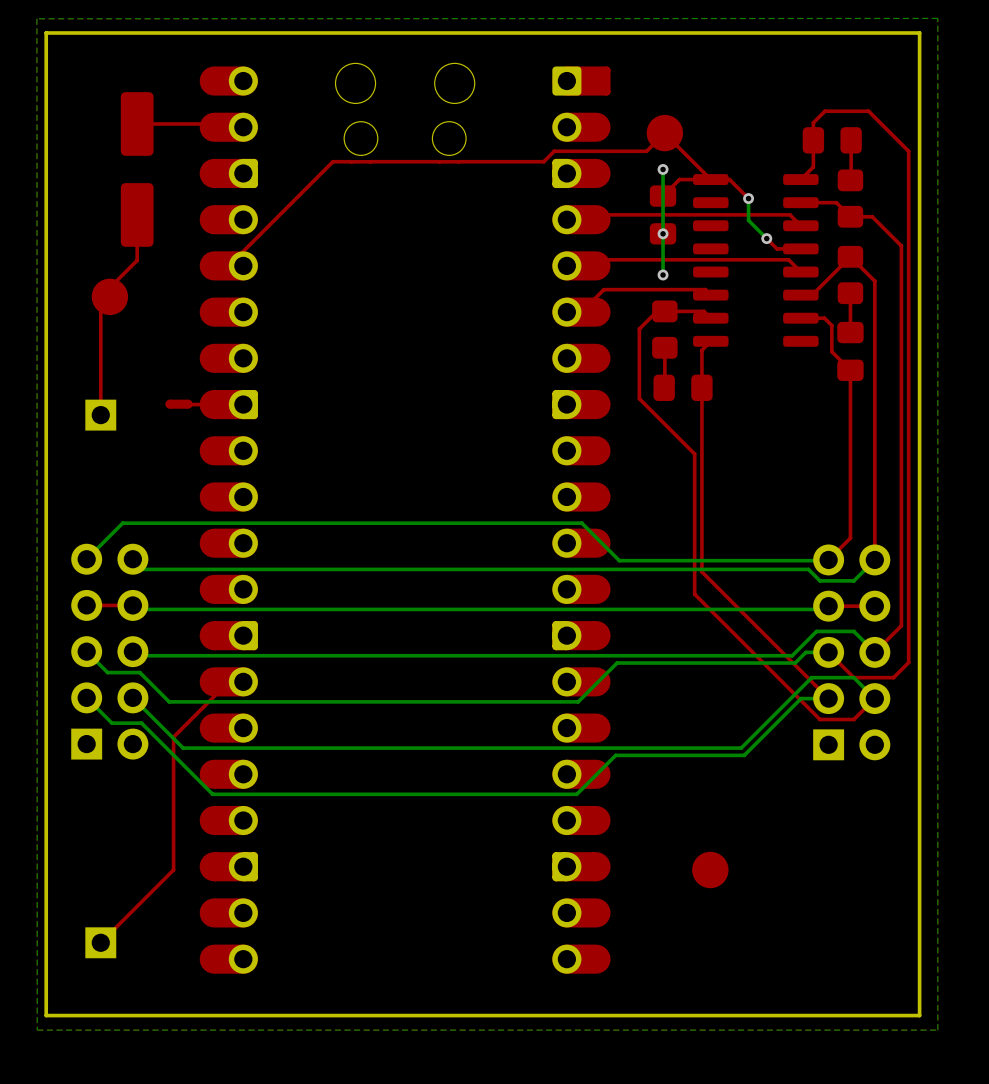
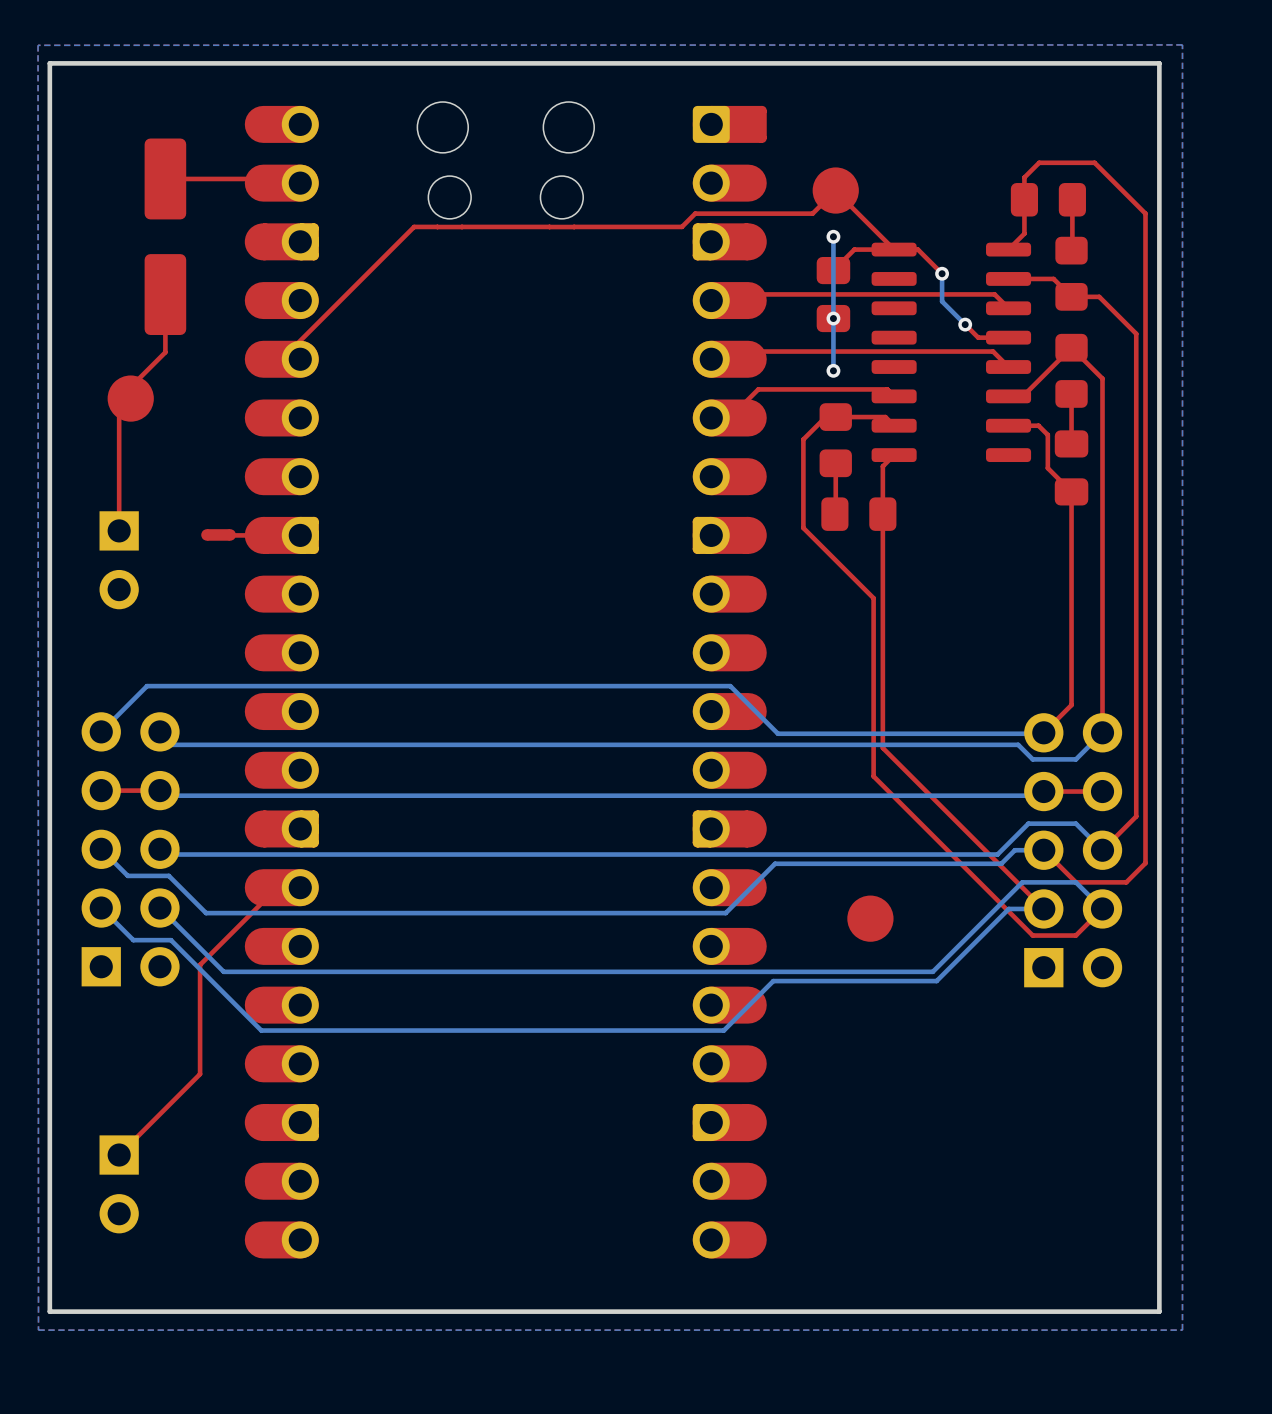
part footprint: [85, 399, 117, 431] -> [99, 511, 139, 610]
top track: (228, 681) (173, 737) (173, 870) (100, 942) -> (281, 887) (277, 887) (200, 964) (200, 1074) (119, 1155)
part position: (710, 870) -> (870, 918)
part: none -> (119, 1184)
part: (100, 942) -> none

